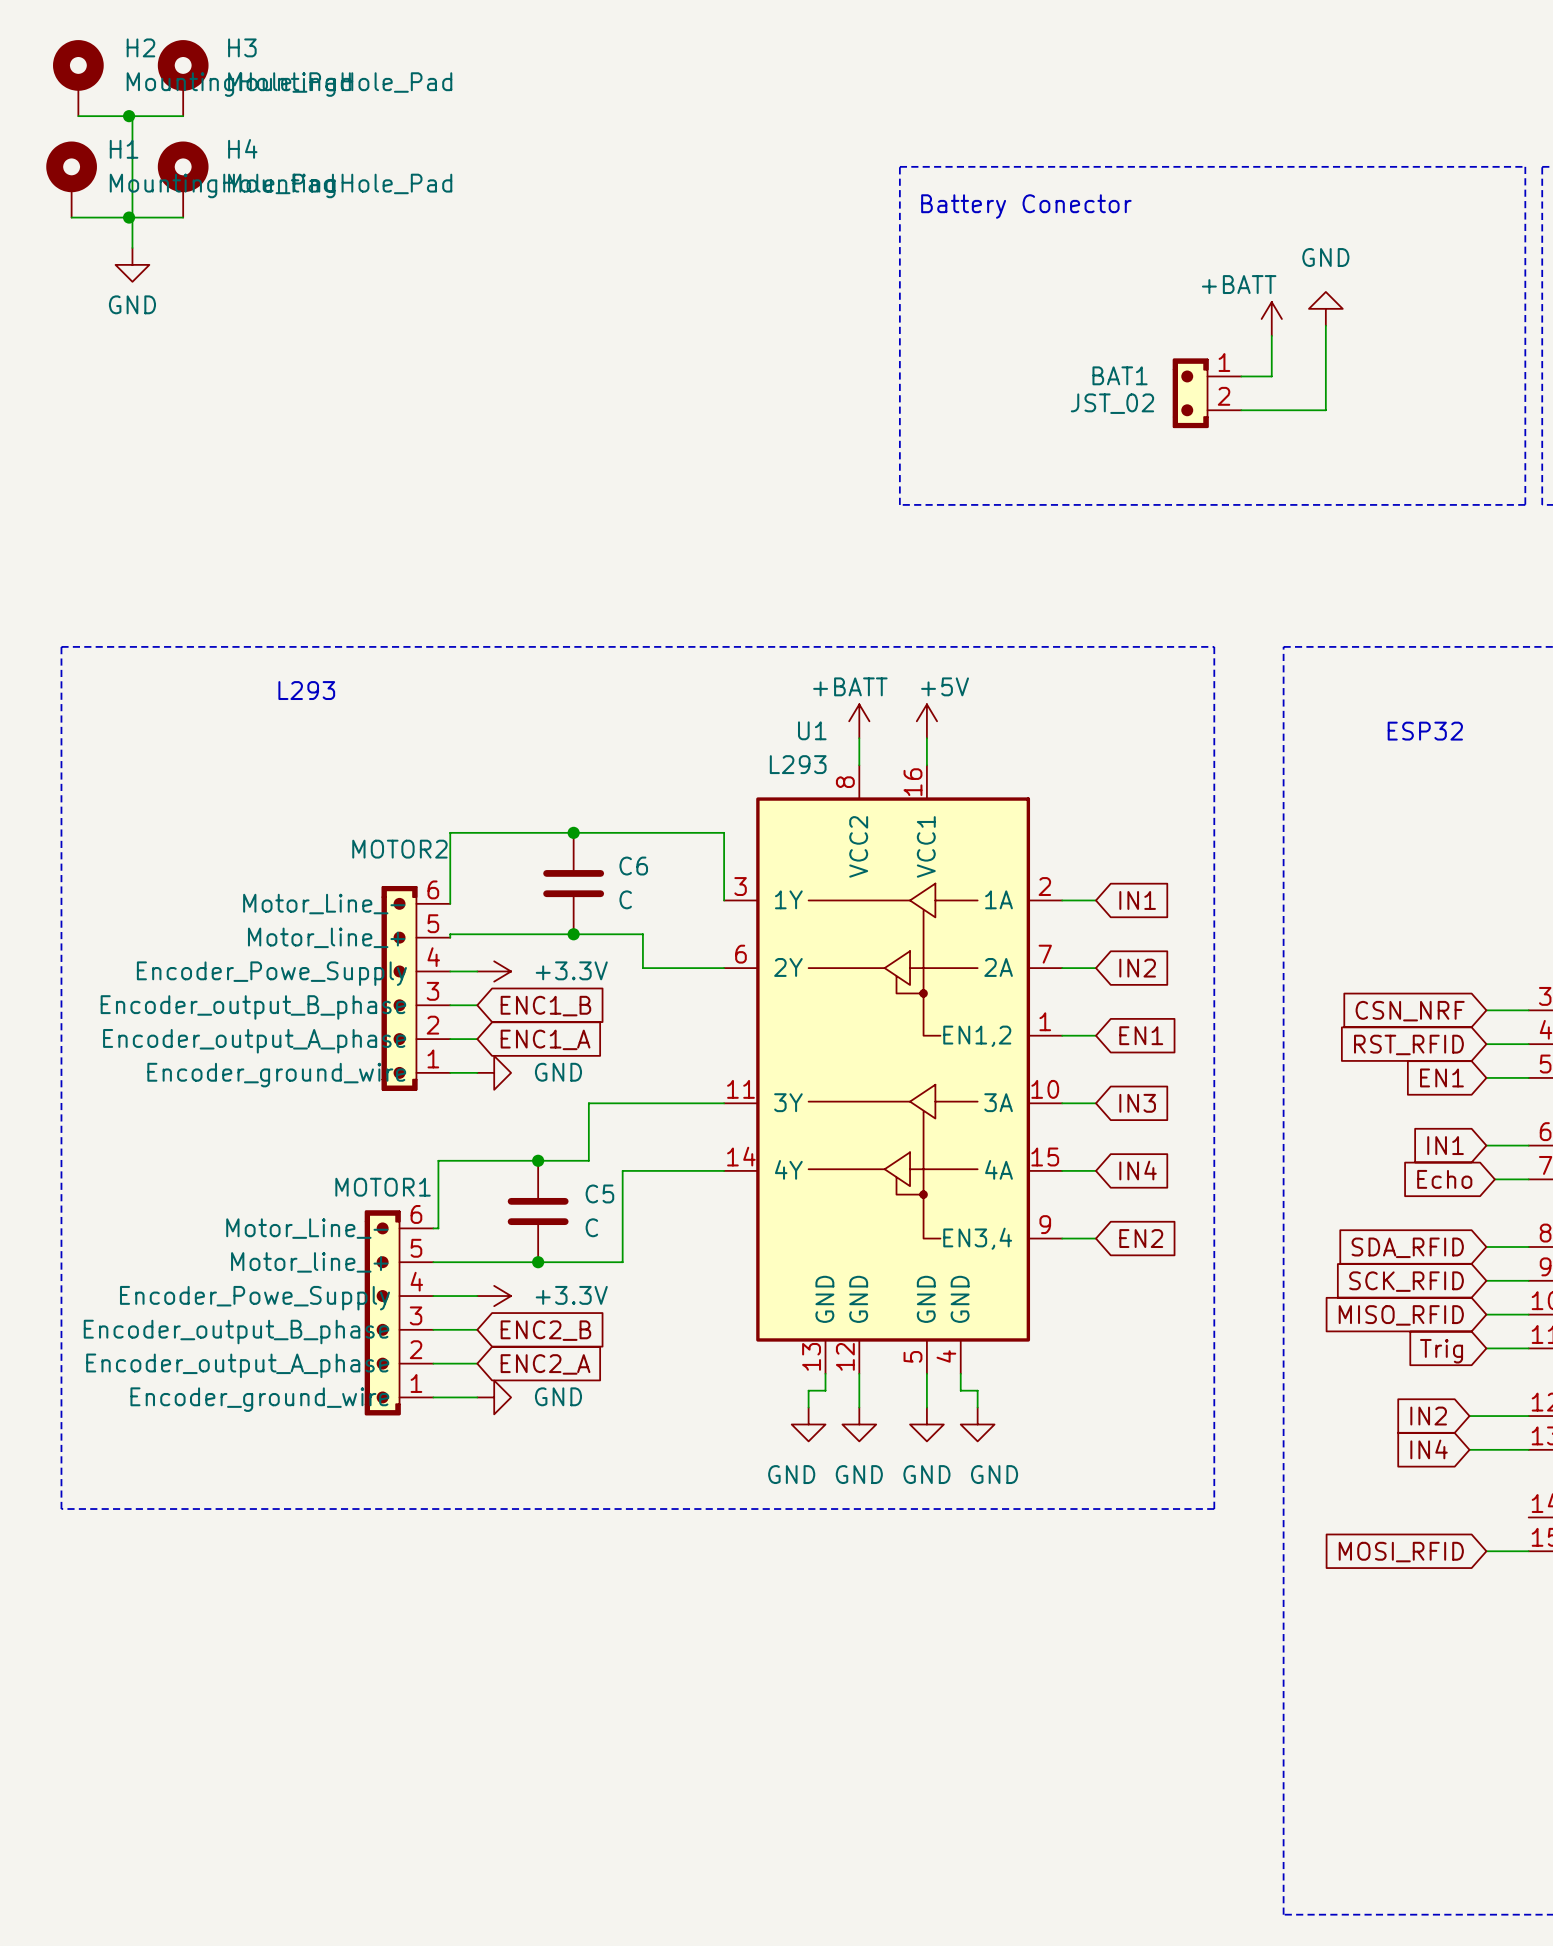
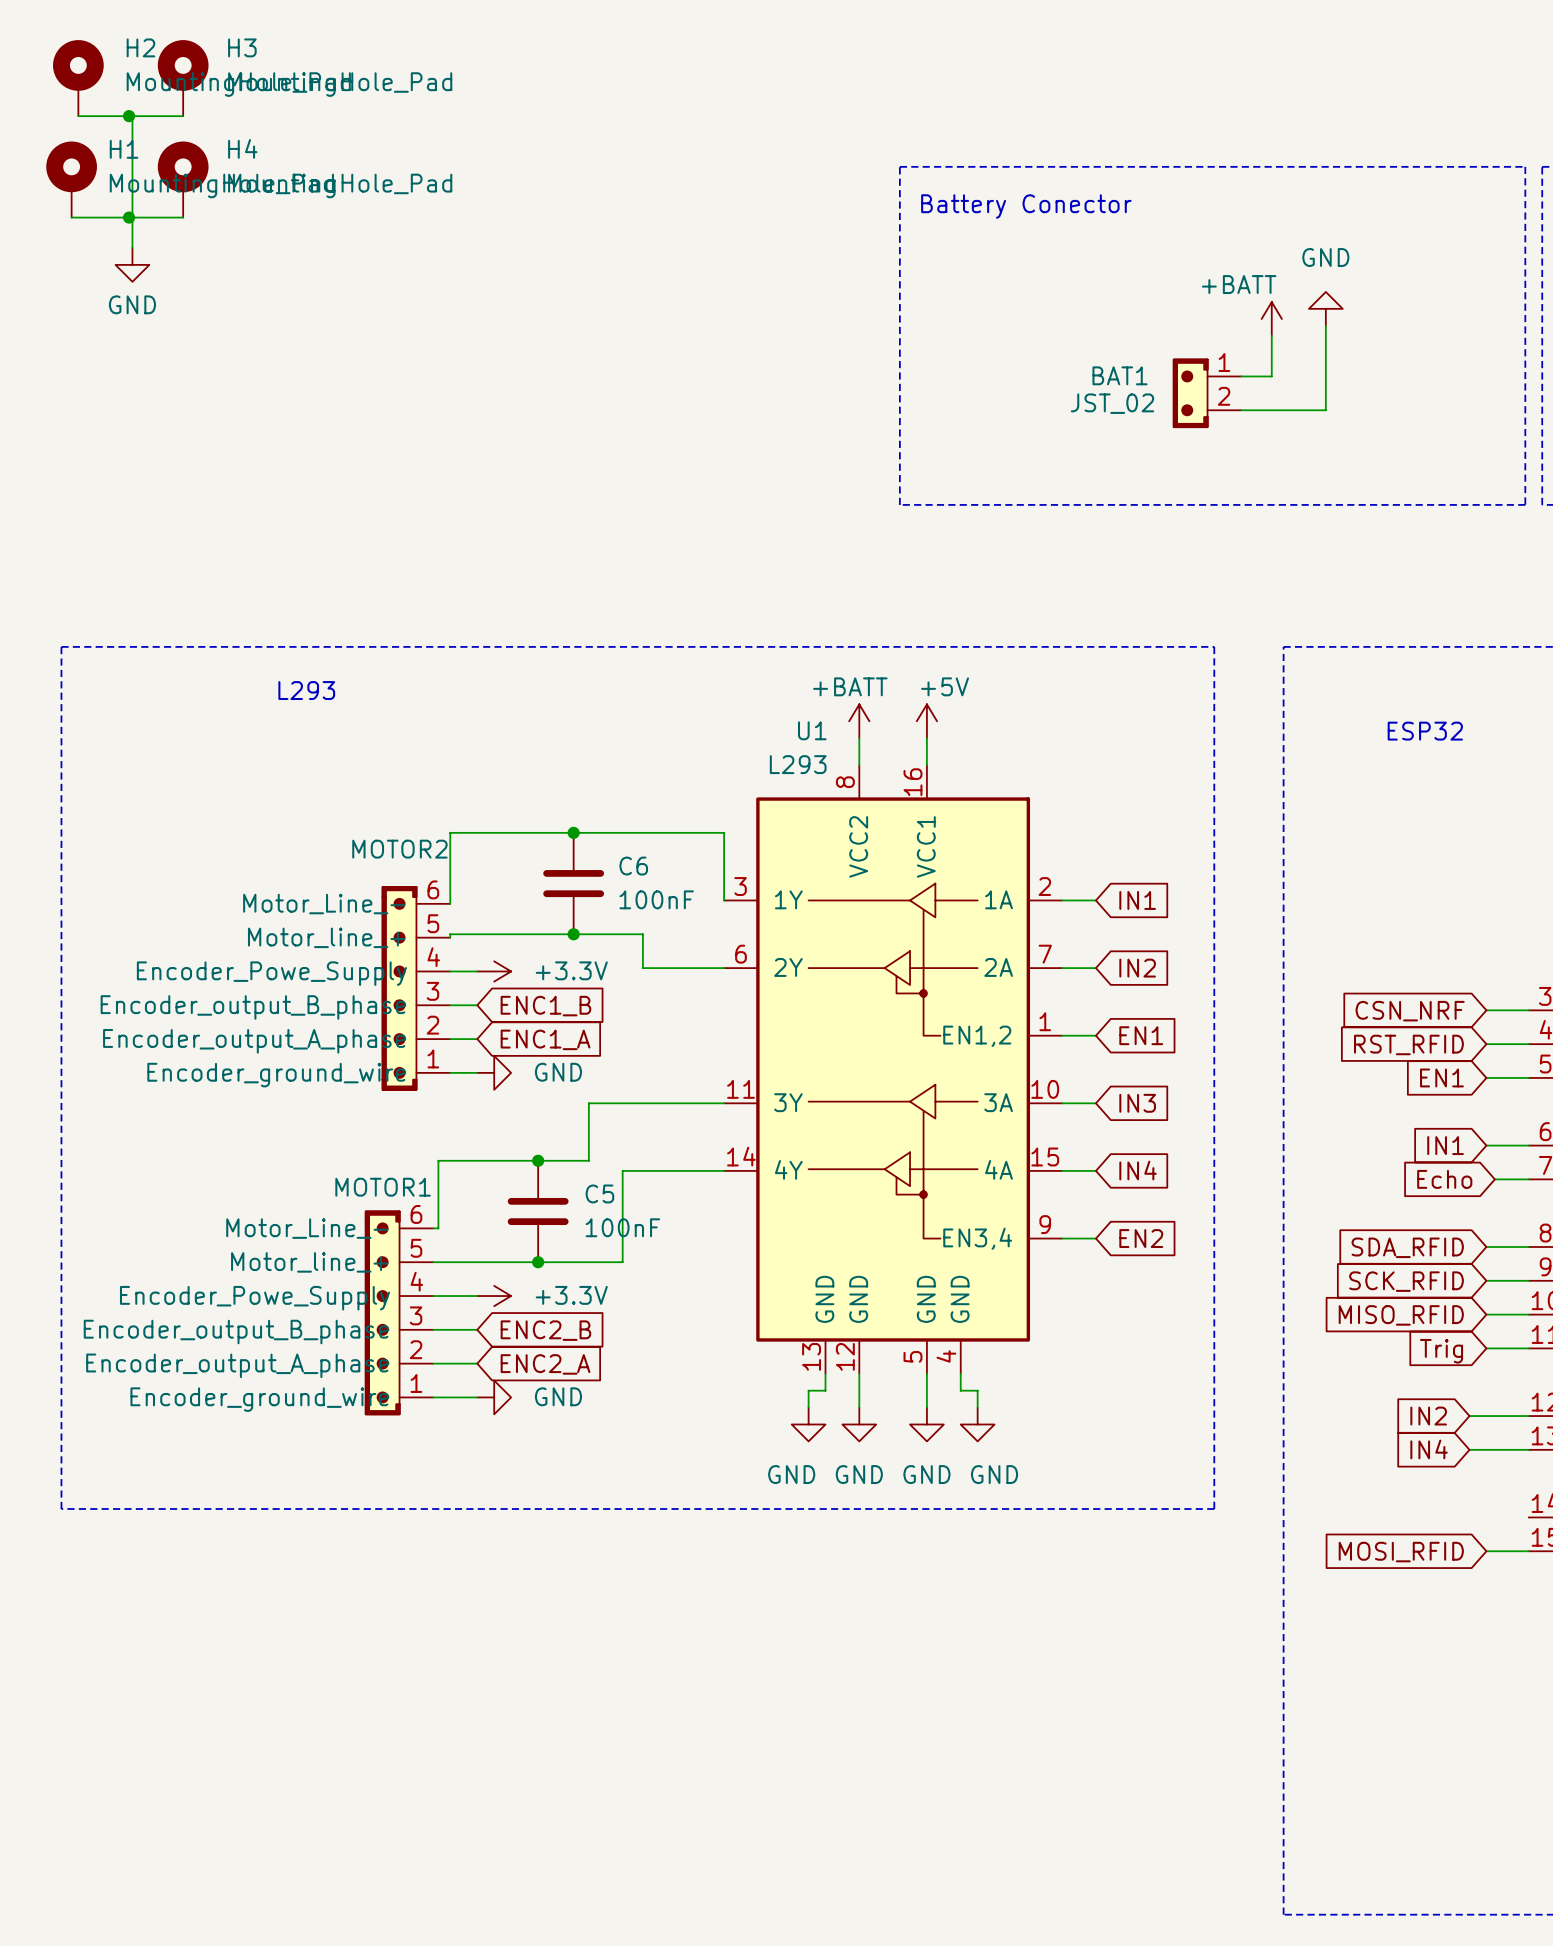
C6 value: C (625, 899) -> 100nF (656, 899)
C5 value: C (591, 1227) -> 100nF (622, 1227)

